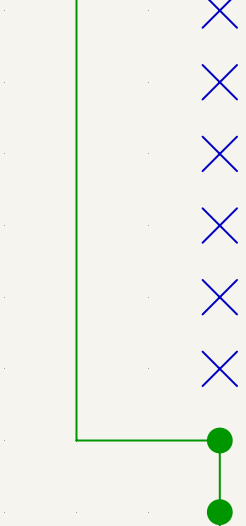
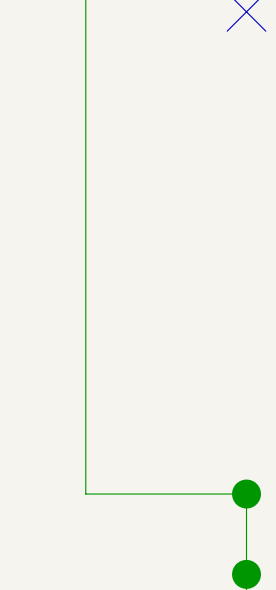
no-connect mark: (219, 82) -> none
no-connect mark: (219, 153) -> none
no-connect mark: (219, 225) -> none
no-connect mark: (219, 297) -> none
no-connect mark: (219, 368) -> none

